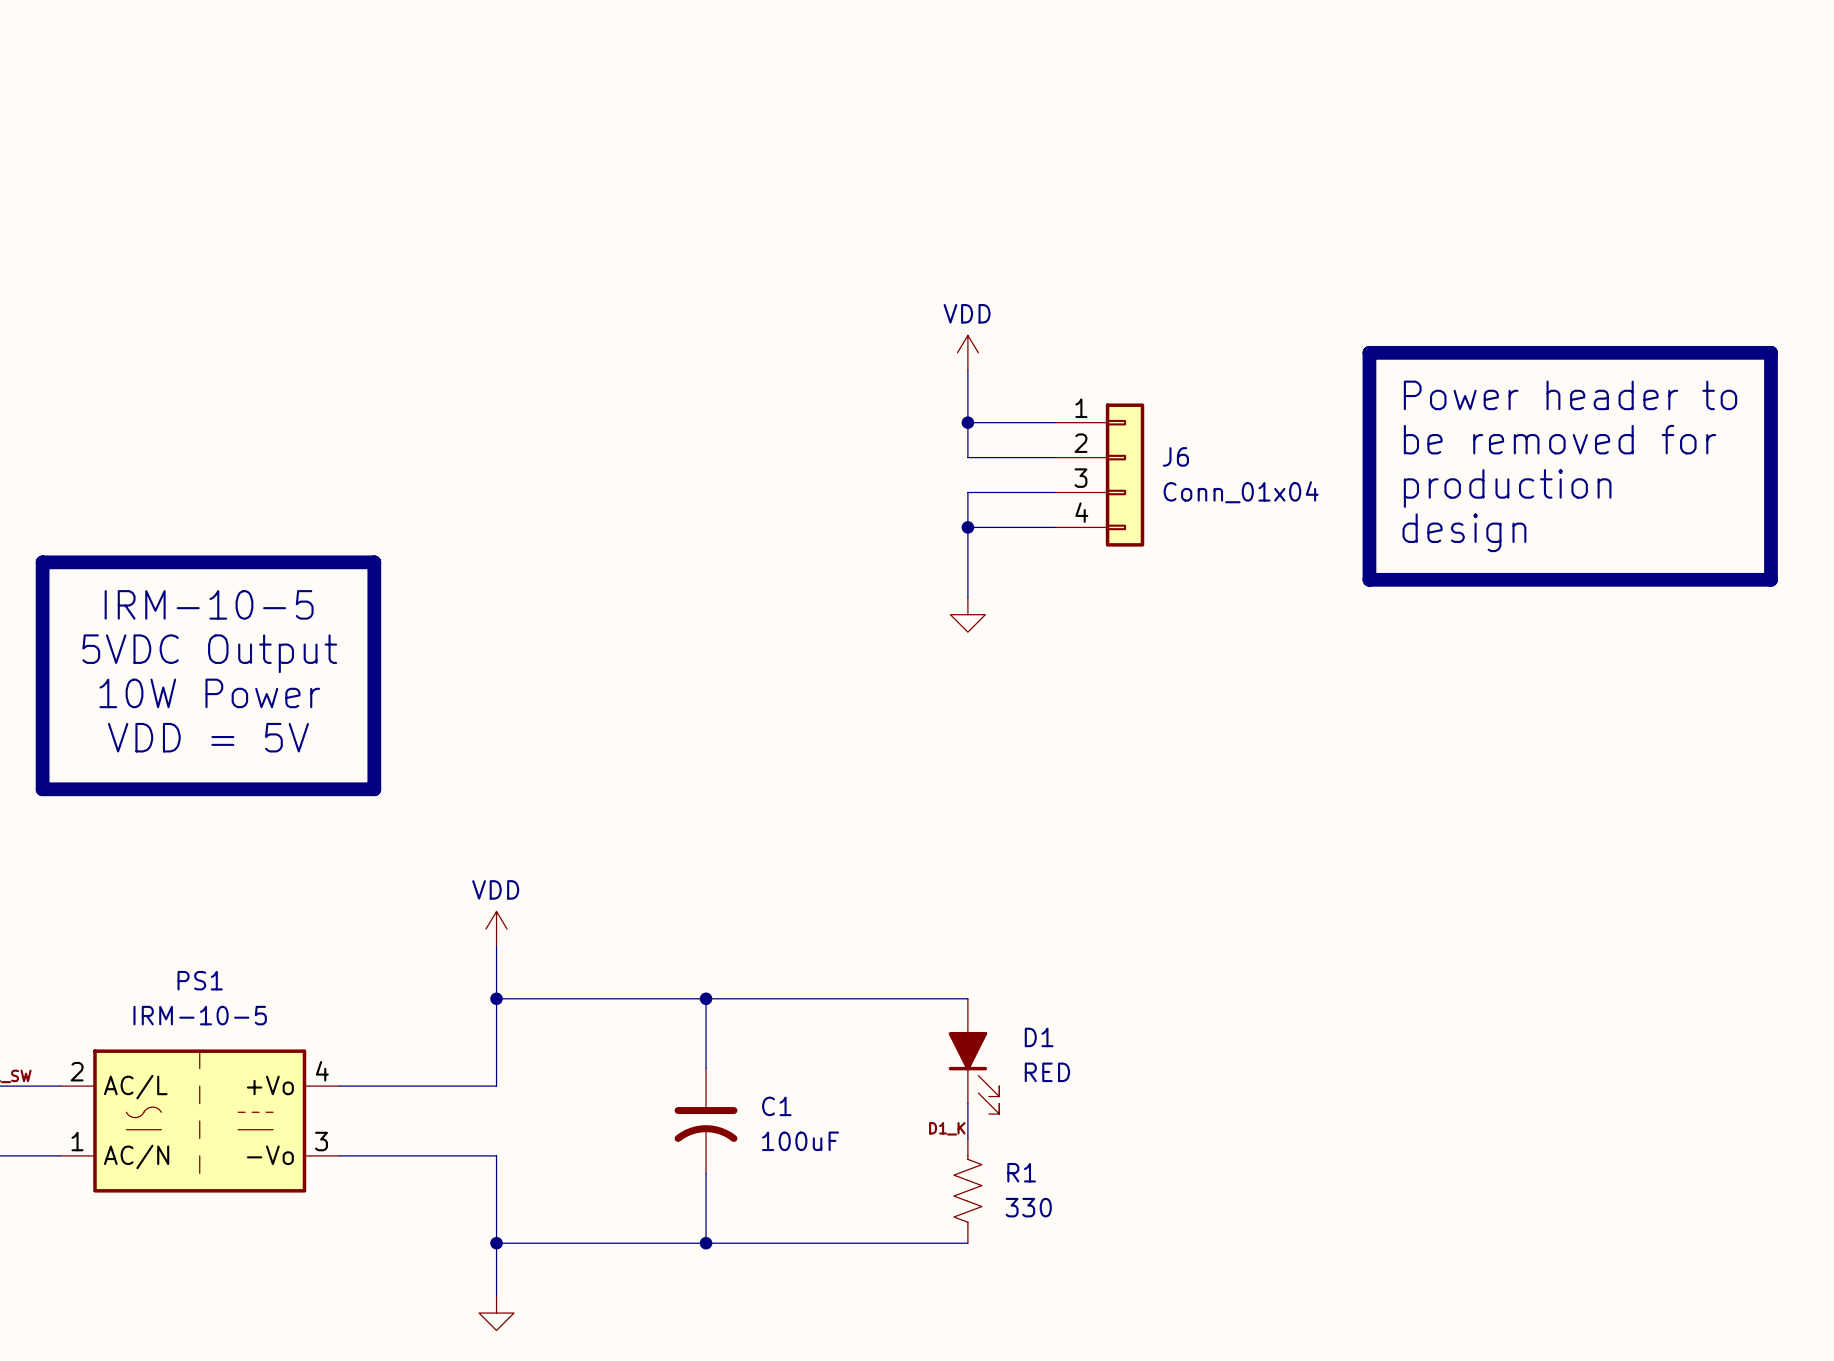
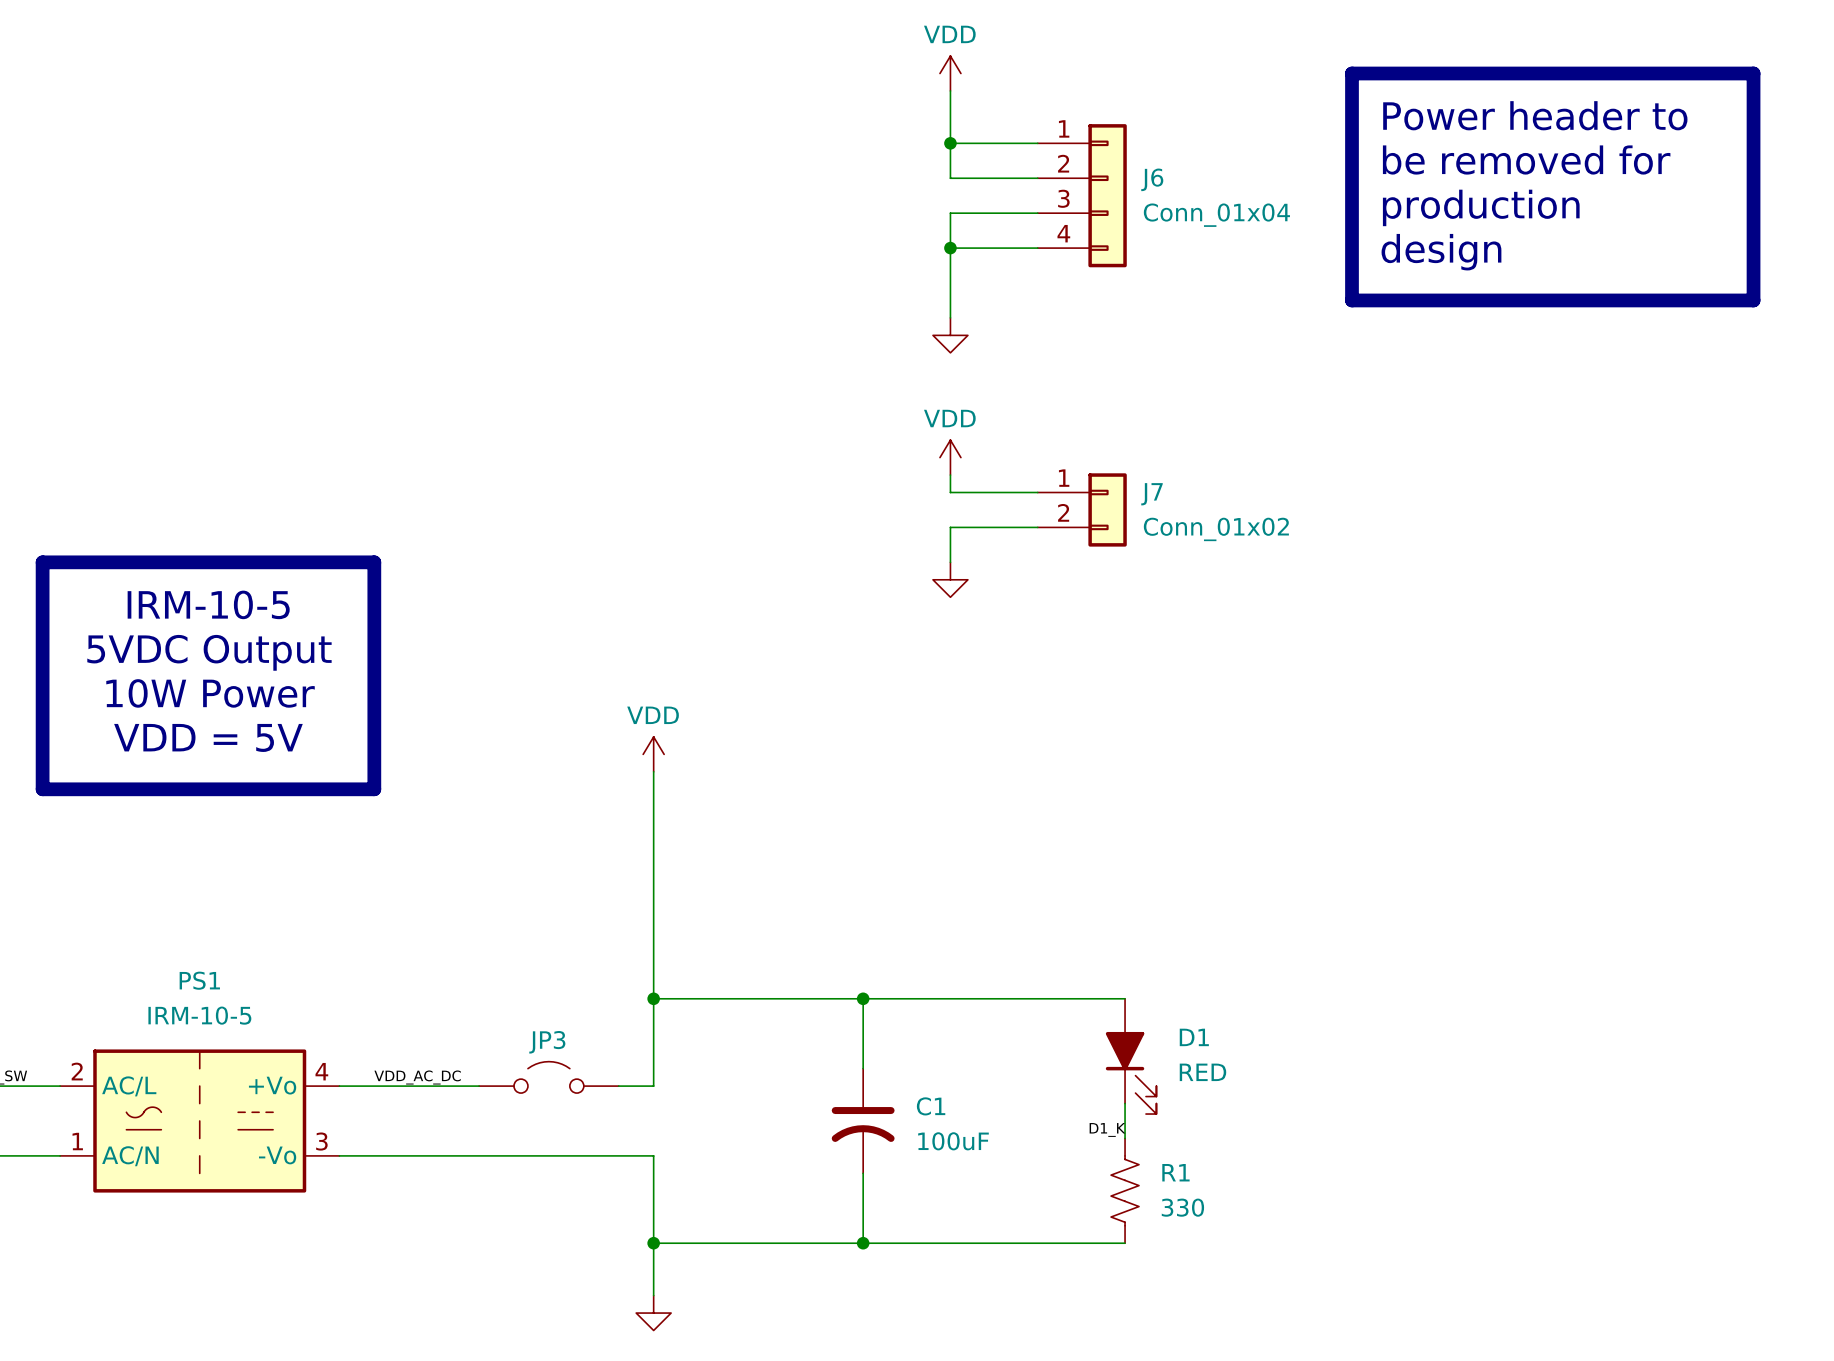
power symbol: none -> VDD (950, 73)
junction: none -> (950, 143)
wire: none -> (1037, 213) (950, 213) (950, 317)
wire: none -> (950, 248) (1037, 248)
junction: none -> (950, 248)
power symbol: none -> (950, 335)
power symbol position: VDD (967, 352) -> VDD (950, 457)
line: (1369, 352) (1770, 352) (1770, 579) (1369, 579) (1369, 352) -> (1351, 73) (1753, 73) (1753, 300) (1351, 300) (1351, 73)
wire: (967, 370) (967, 457) (1055, 457) -> (950, 90) (950, 178) (1037, 178)
text position: Power header to (1570, 395) -> Power header to (1535, 115)
wire: (967, 422) (1055, 422) -> (950, 143) (1037, 143)
junction: (967, 422) -> none
text position: be removed for (1560, 439) -> be removed for (1526, 160)
J6 position: (1099, 475) -> (1082, 195)
text position: production (1507, 488) -> production (1481, 207)
wire: (967, 492) (967, 597) -> (967, 492) (950, 492) (950, 475)
J7: none -> Conn_01x02 (1082, 509)
wire: none -> (967, 527) (950, 527) (950, 562)
junction: (967, 527) -> none
text position: design (1464, 532) -> design (1441, 252)
power symbol position: (967, 614) -> (950, 579)
wire: none -> (653, 771) (653, 1086) (618, 1086)
power symbol position: VDD (496, 928) -> VDD (653, 754)
wire: (496, 946) (496, 1086) (479, 1086) -> none
wire: (496, 998) (653, 998) -> none
junction: (496, 998) -> none
wire: (706, 998) (706, 1068) -> (863, 998) (863, 1068)
junction position: (706, 998) -> (653, 998)
junction: none -> (863, 998)
wire: none -> (967, 998) (1125, 998)
D1 position: (974, 1056) -> (1131, 1056)
label: none -> VDD_AC_DC (417, 1077)
JP3: none -> (548, 1077)
wire: (967, 1103) (967, 1138) -> (1125, 1103) (1125, 1138)
C1 position: (706, 1121) -> (863, 1121)
label position: D1_K (947, 1128) -> D1_K (1107, 1129)
wire: (496, 1155) (496, 1295) -> (496, 1155) (653, 1155) (653, 1295)
wire: (706, 1173) (706, 1243) -> (863, 1173) (863, 1243)
R1 position: (967, 1190) -> (1125, 1190)
wire: (496, 1243) (653, 1243) -> none
junction: (496, 1243) -> none
junction position: (706, 1243) -> (653, 1243)
junction: none -> (863, 1243)
wire: none -> (967, 1243) (1125, 1243)
power symbol position: (496, 1313) -> (653, 1313)

